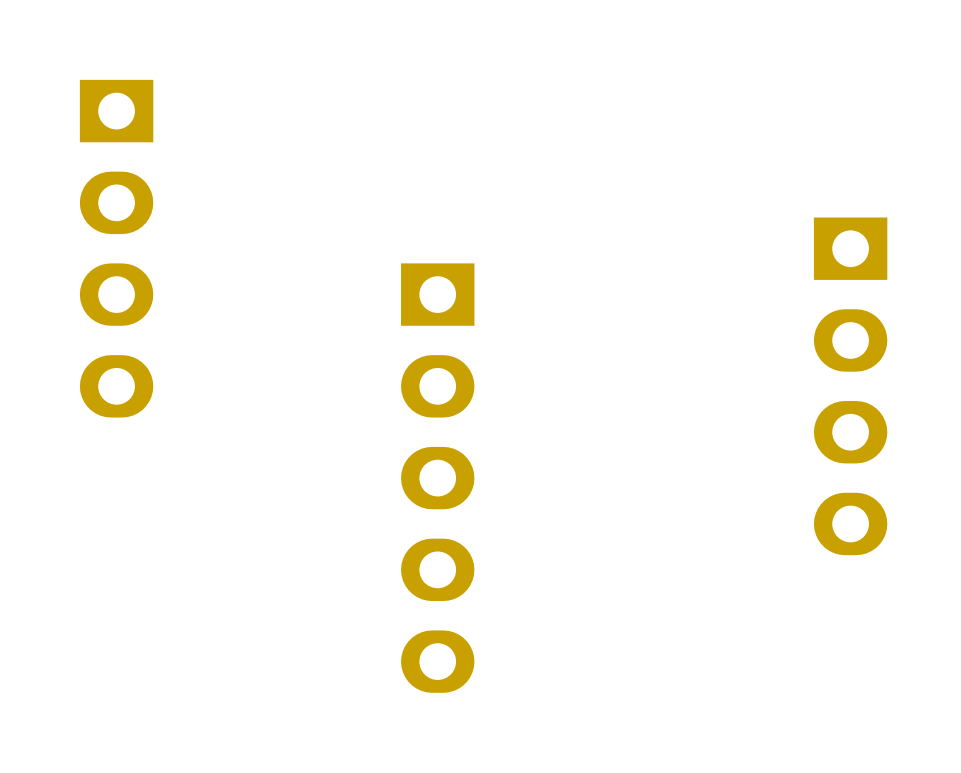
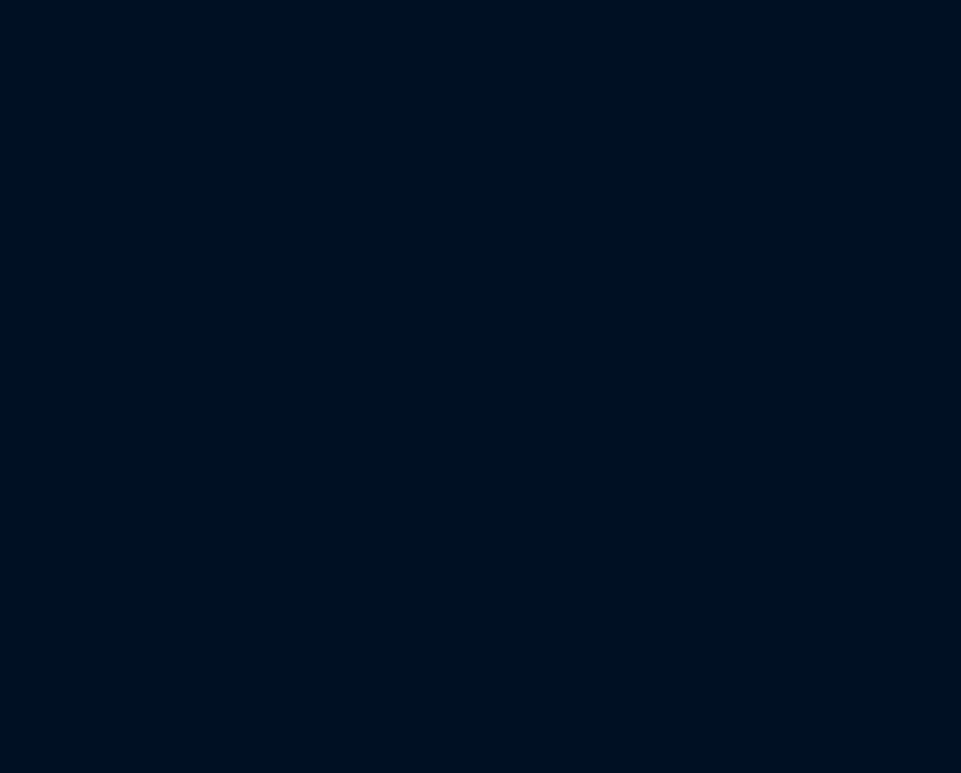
part: (116, 248) -> none
part: (850, 386) -> none
part: (437, 478) -> none

